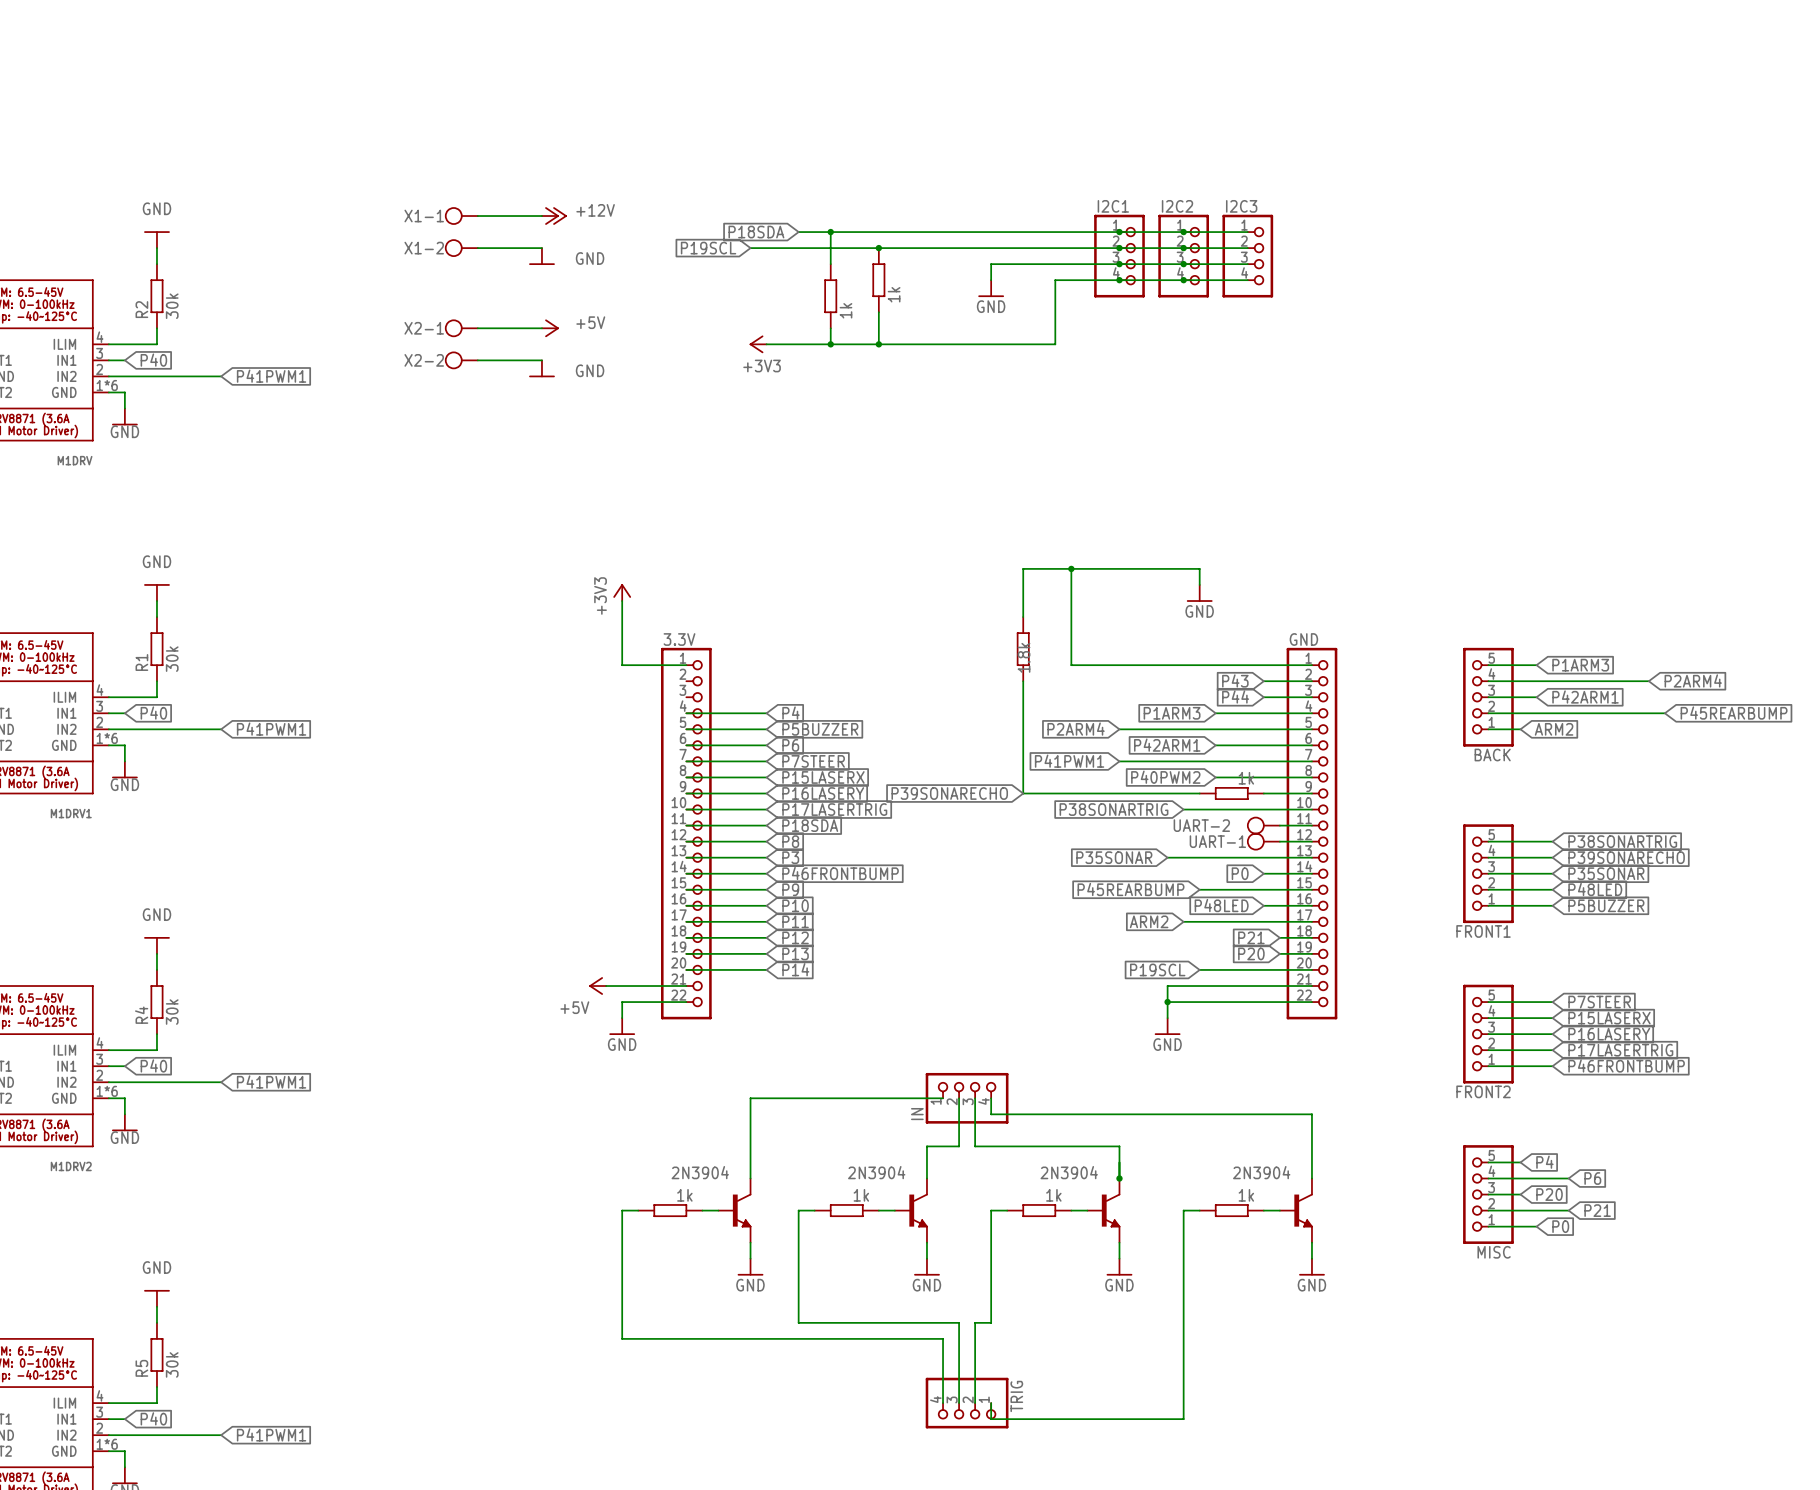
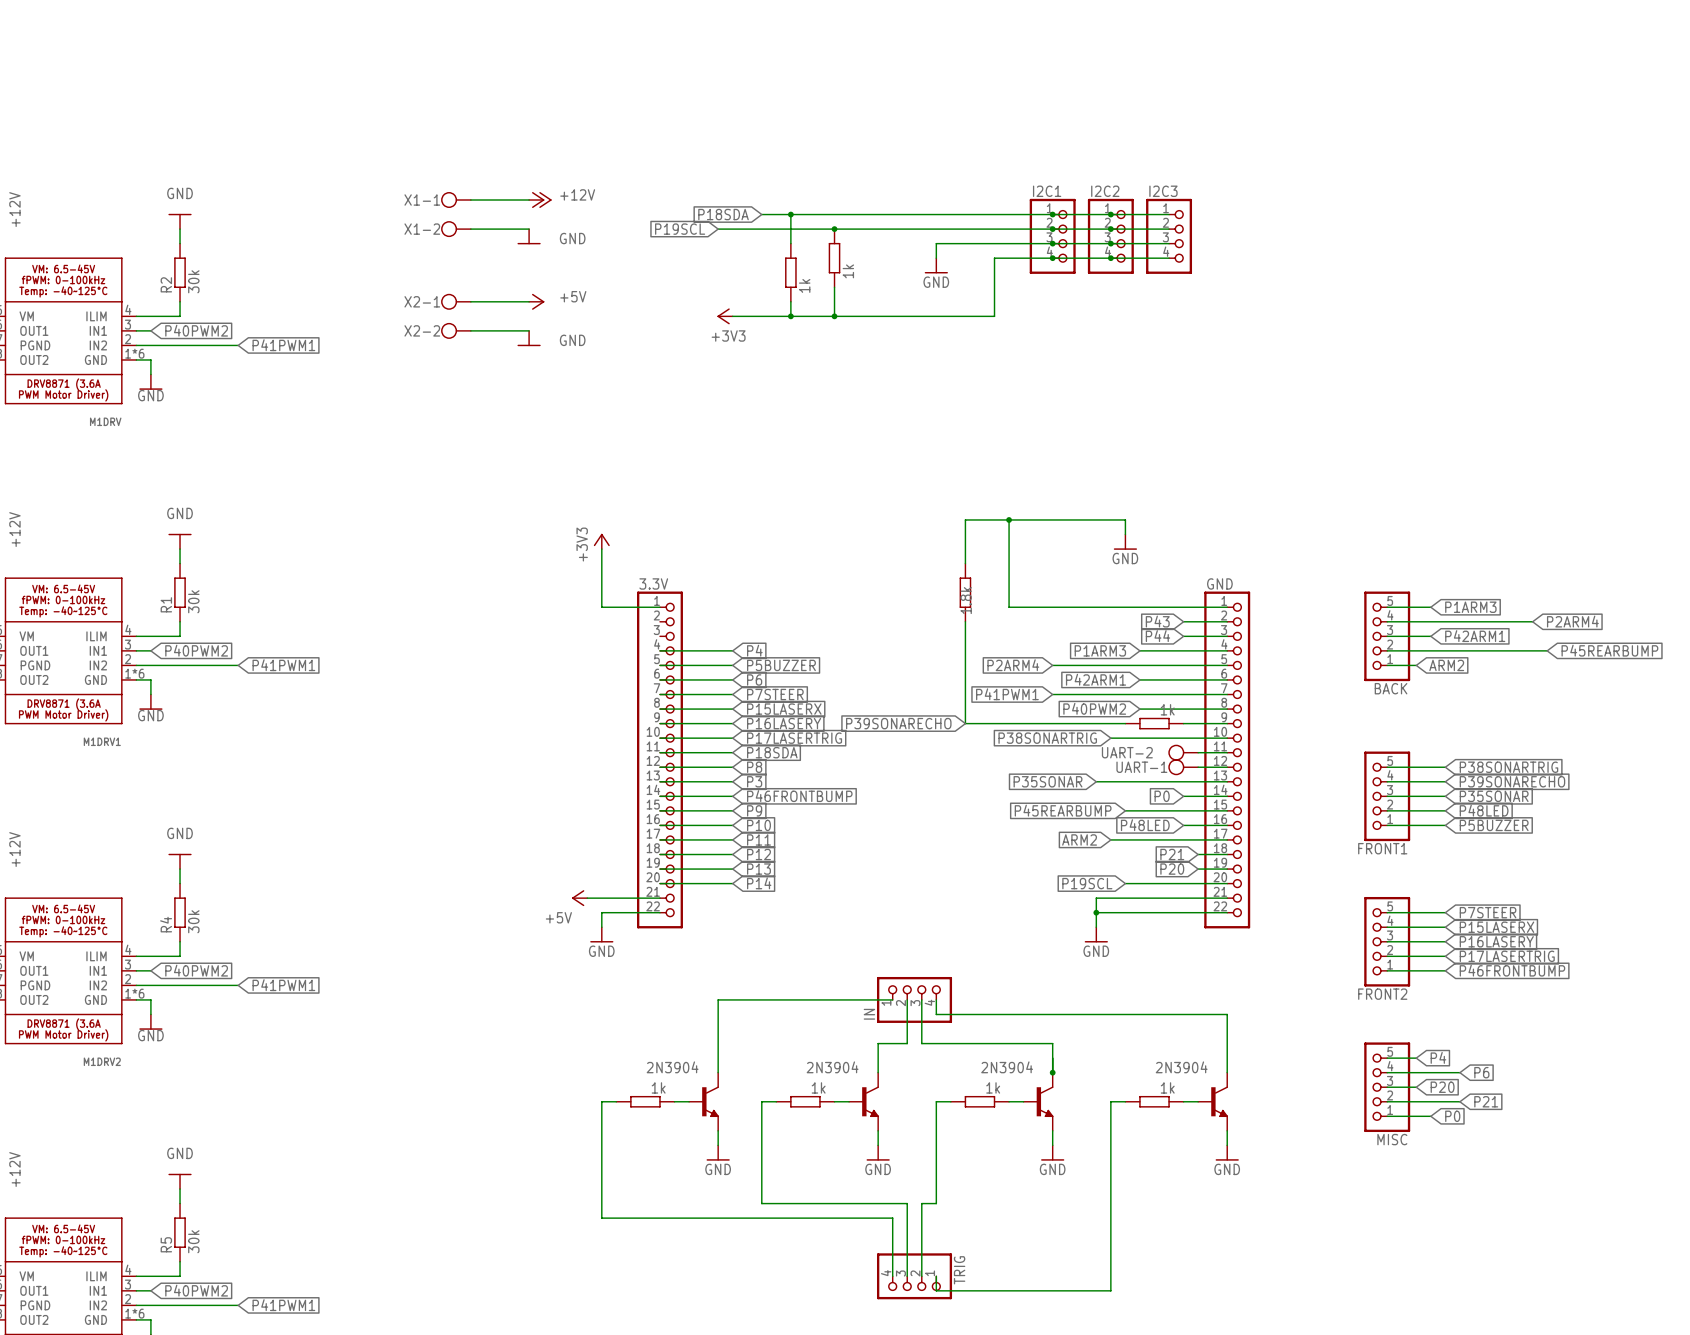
global label: P40 (153, 360) -> P40PWM2 (196, 330)
global label: P40 (153, 713) -> P40PWM2 (196, 650)
global label: P40 (153, 1065) -> P40PWM2 (196, 970)
global label: P40 (153, 1418) -> P40PWM2 (196, 1290)

